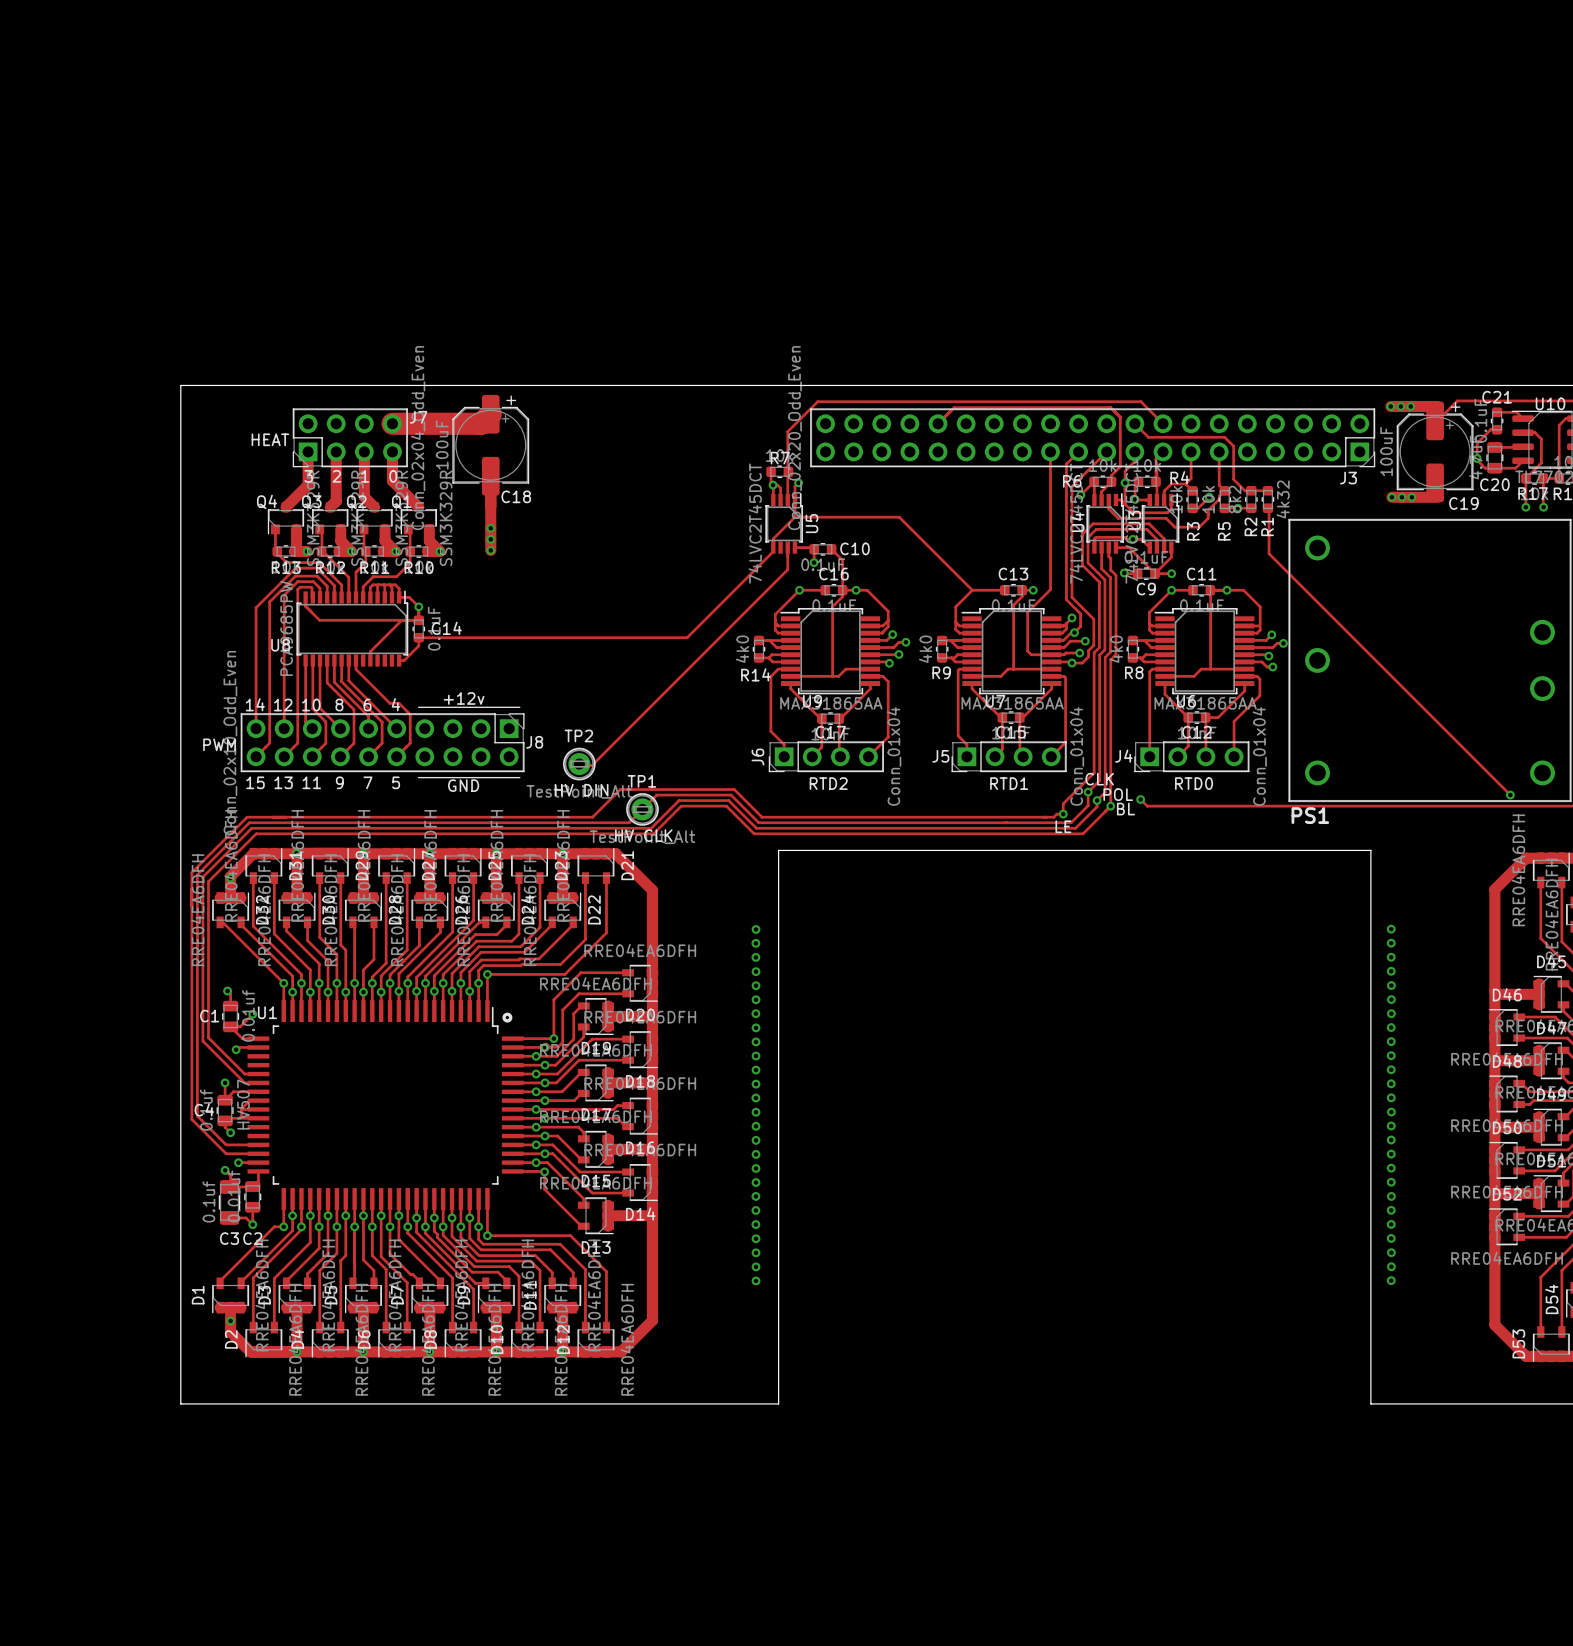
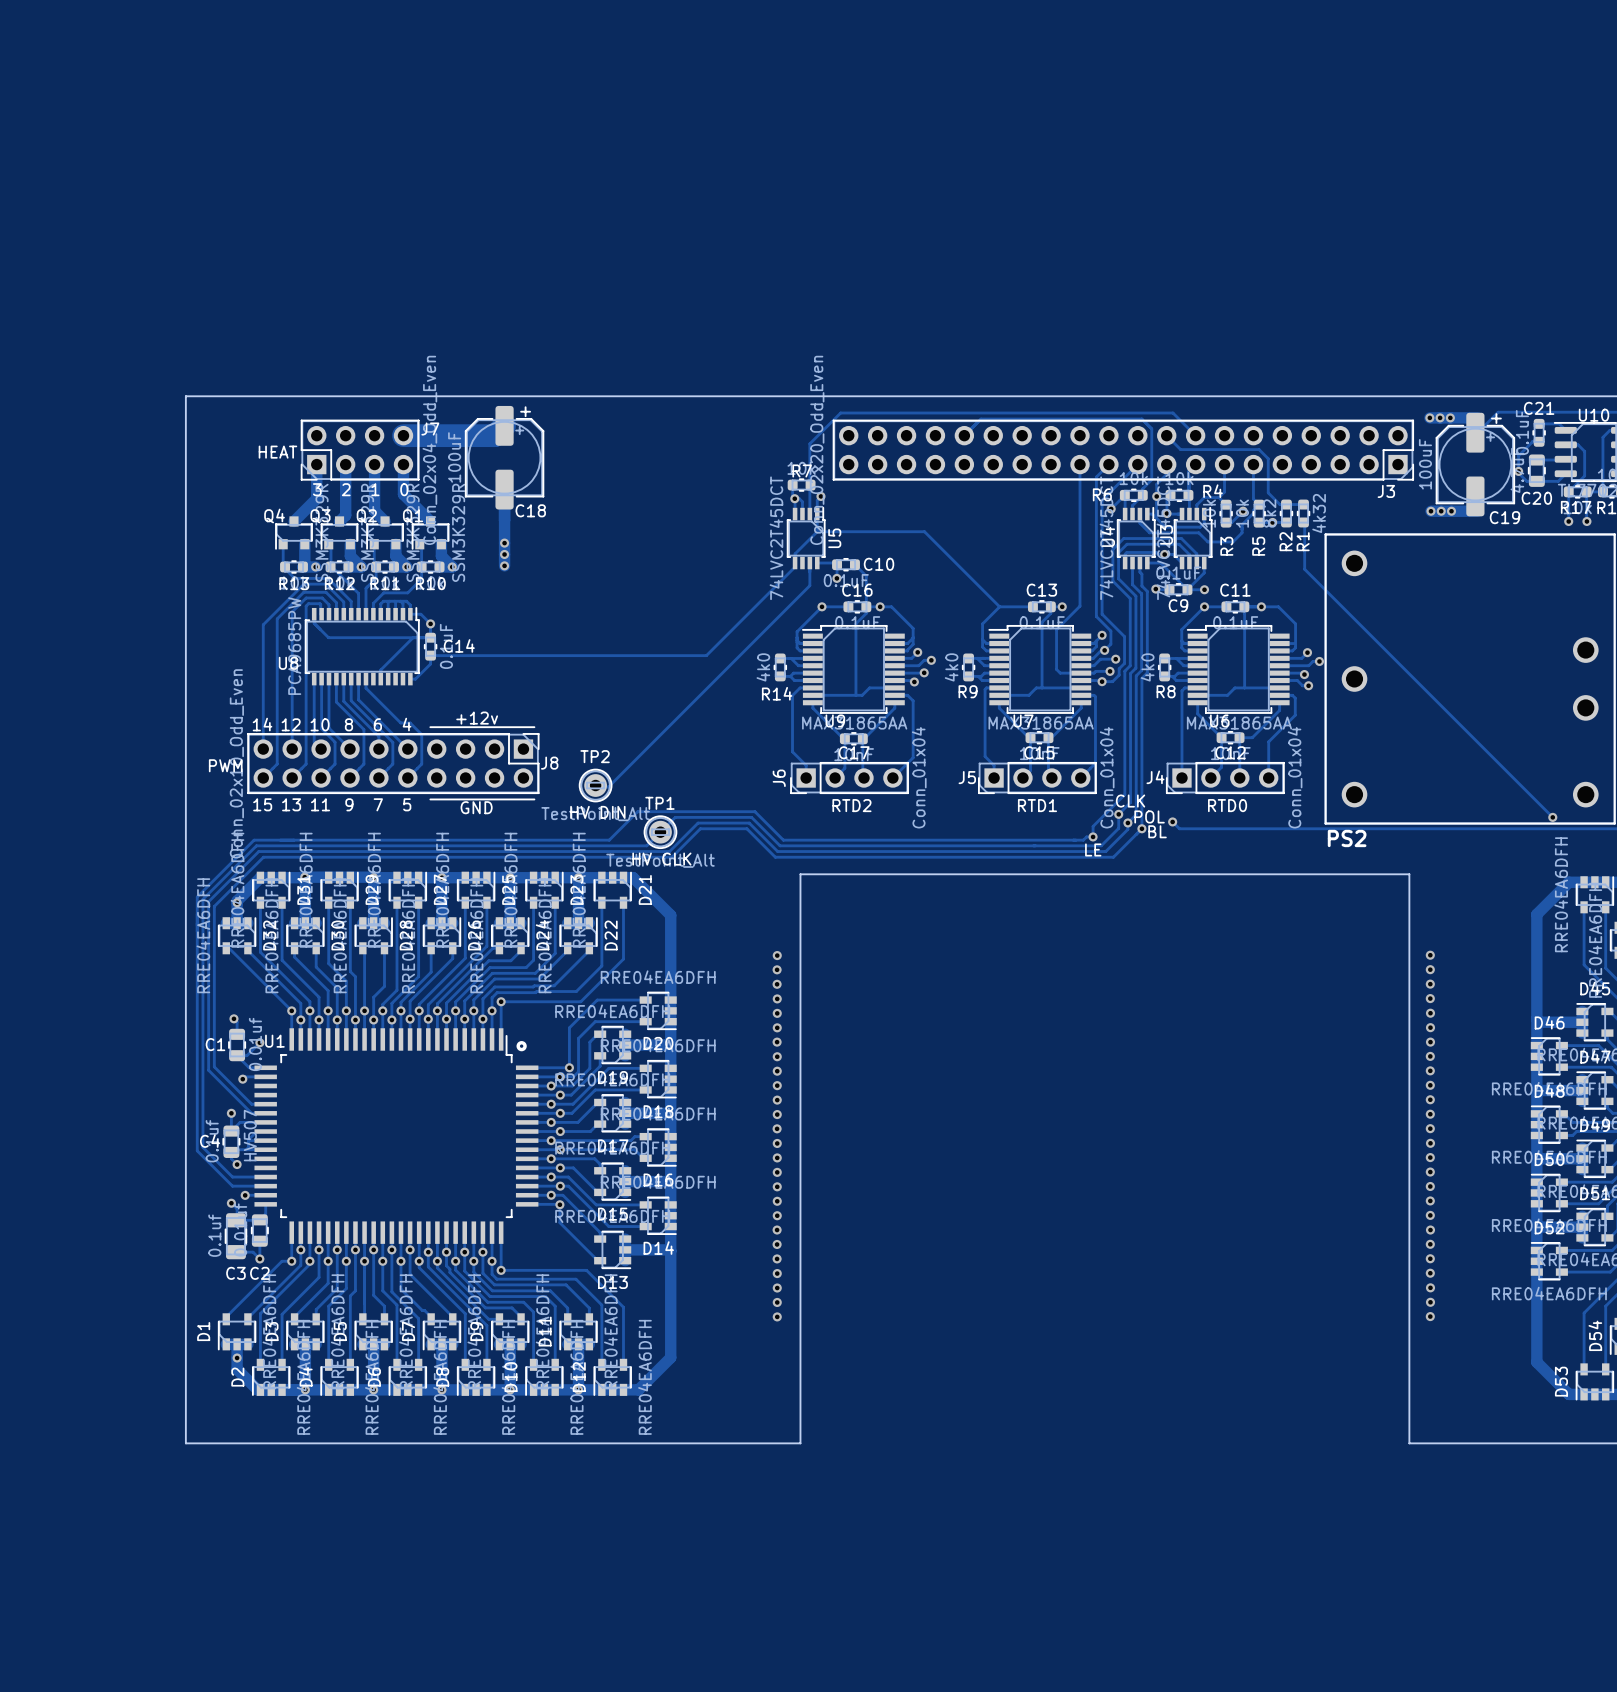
PS1 name: PS1 (1310, 815) -> PS2 (1347, 838)

